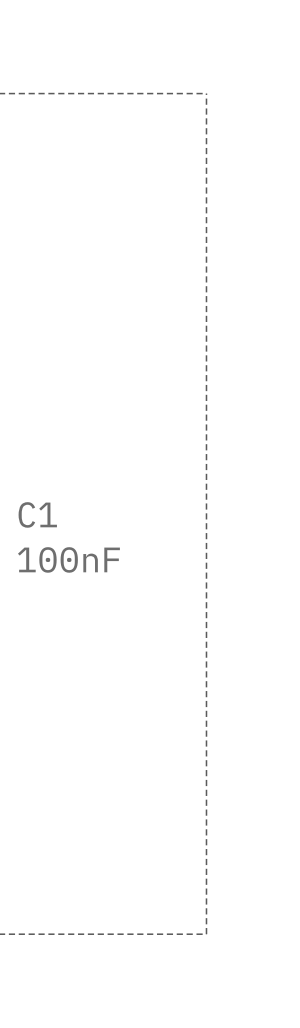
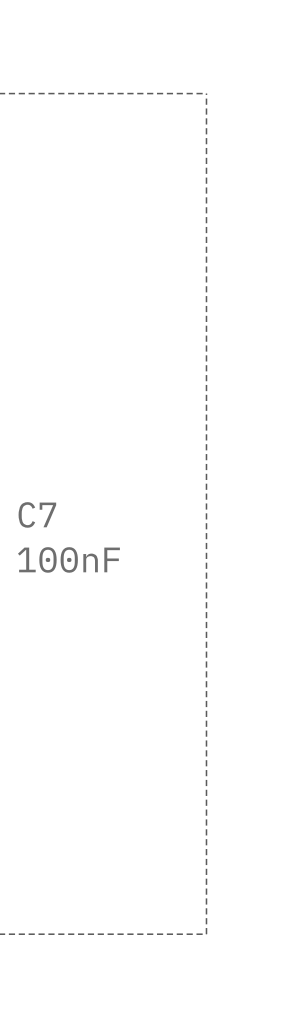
C1 name: C1 (37, 514) -> C7 (37, 514)

